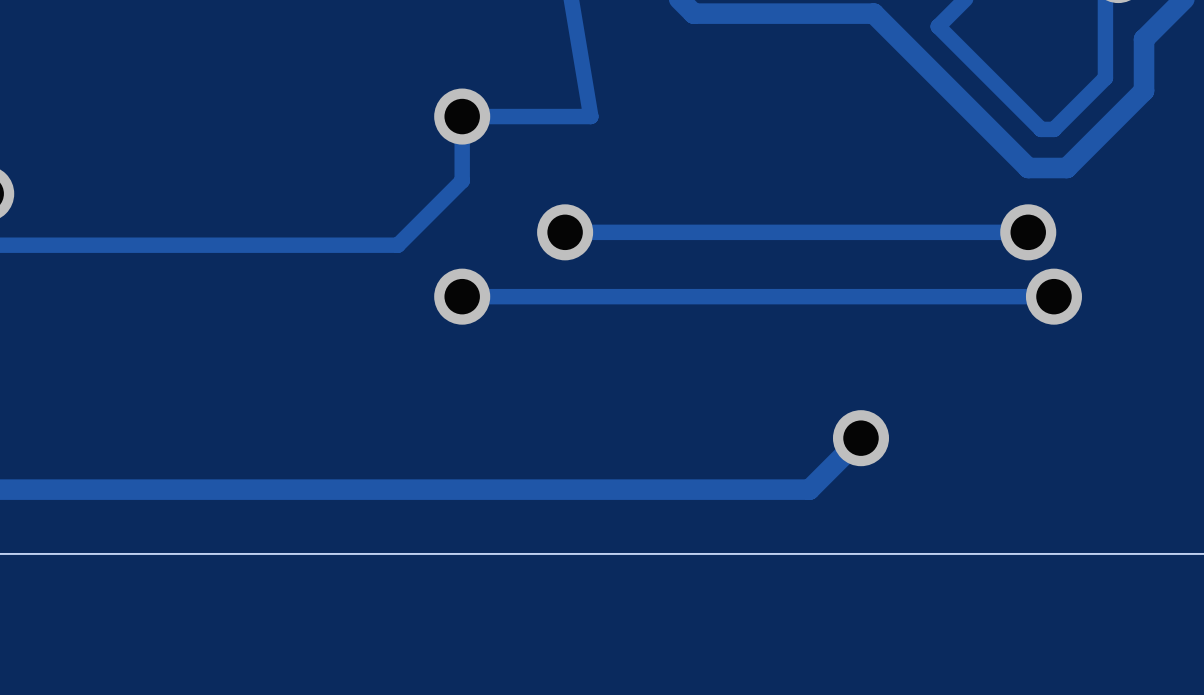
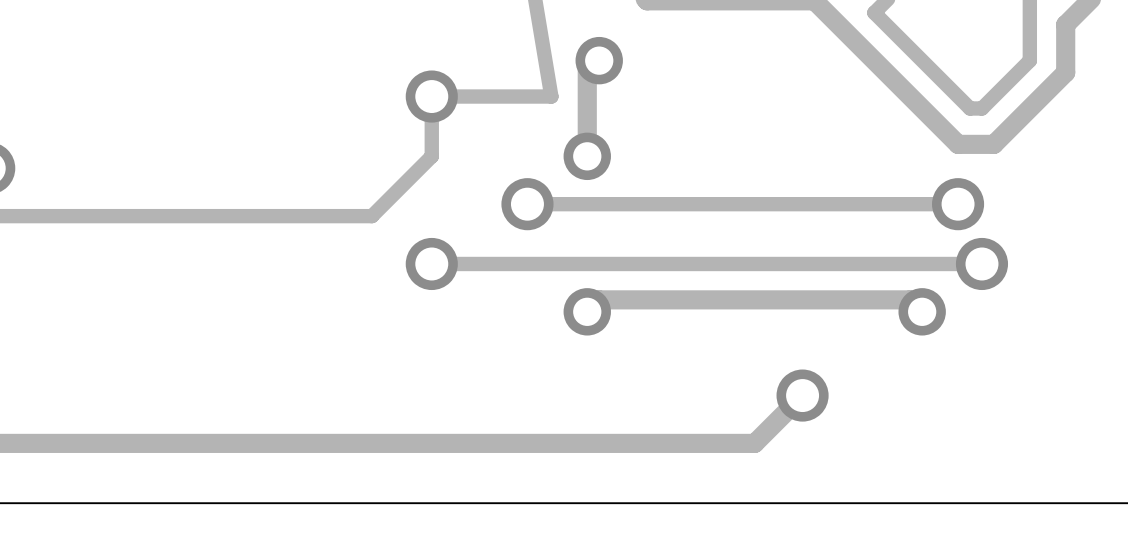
track: none -> (599, 60) (587, 60) (587, 156)
via: none -> (599, 60)
via: none -> (587, 156)
via: none -> (587, 311)
track: none -> (922, 311) (910, 299) (599, 299) (587, 311)
via: none -> (922, 311)

